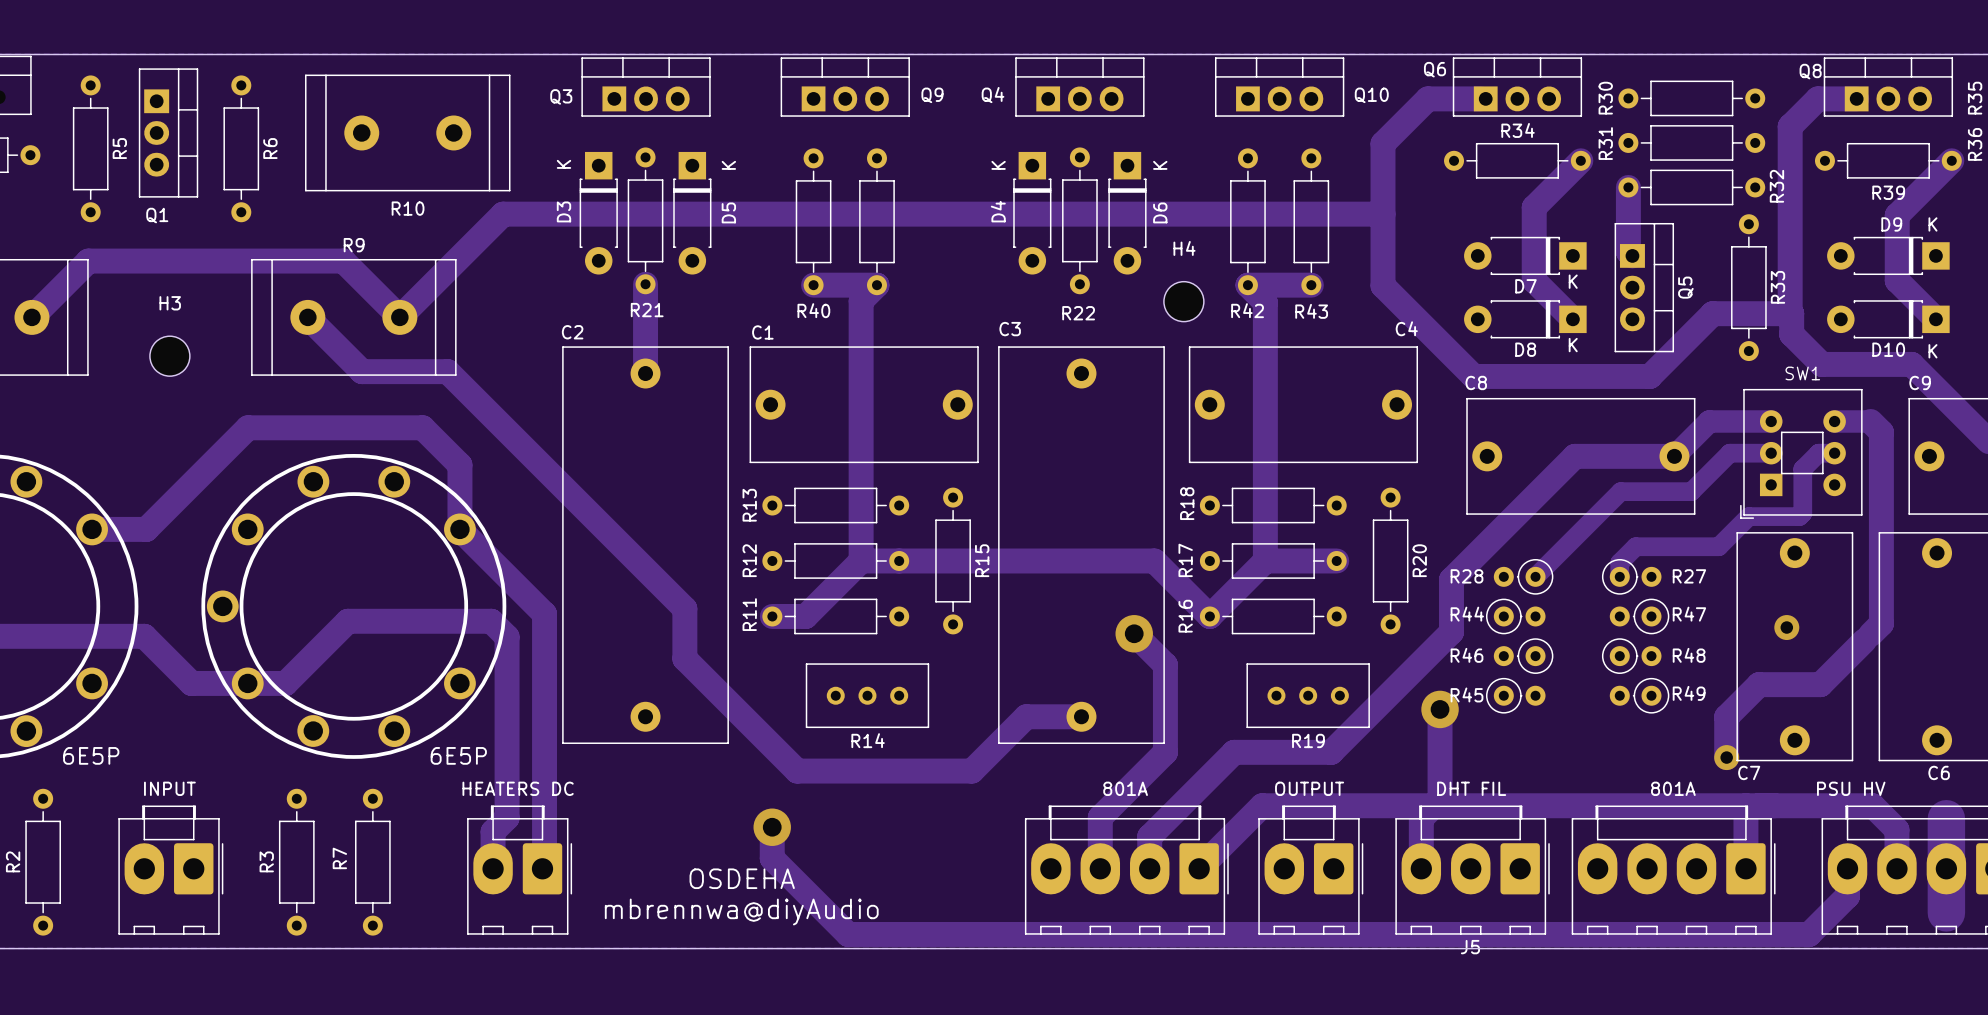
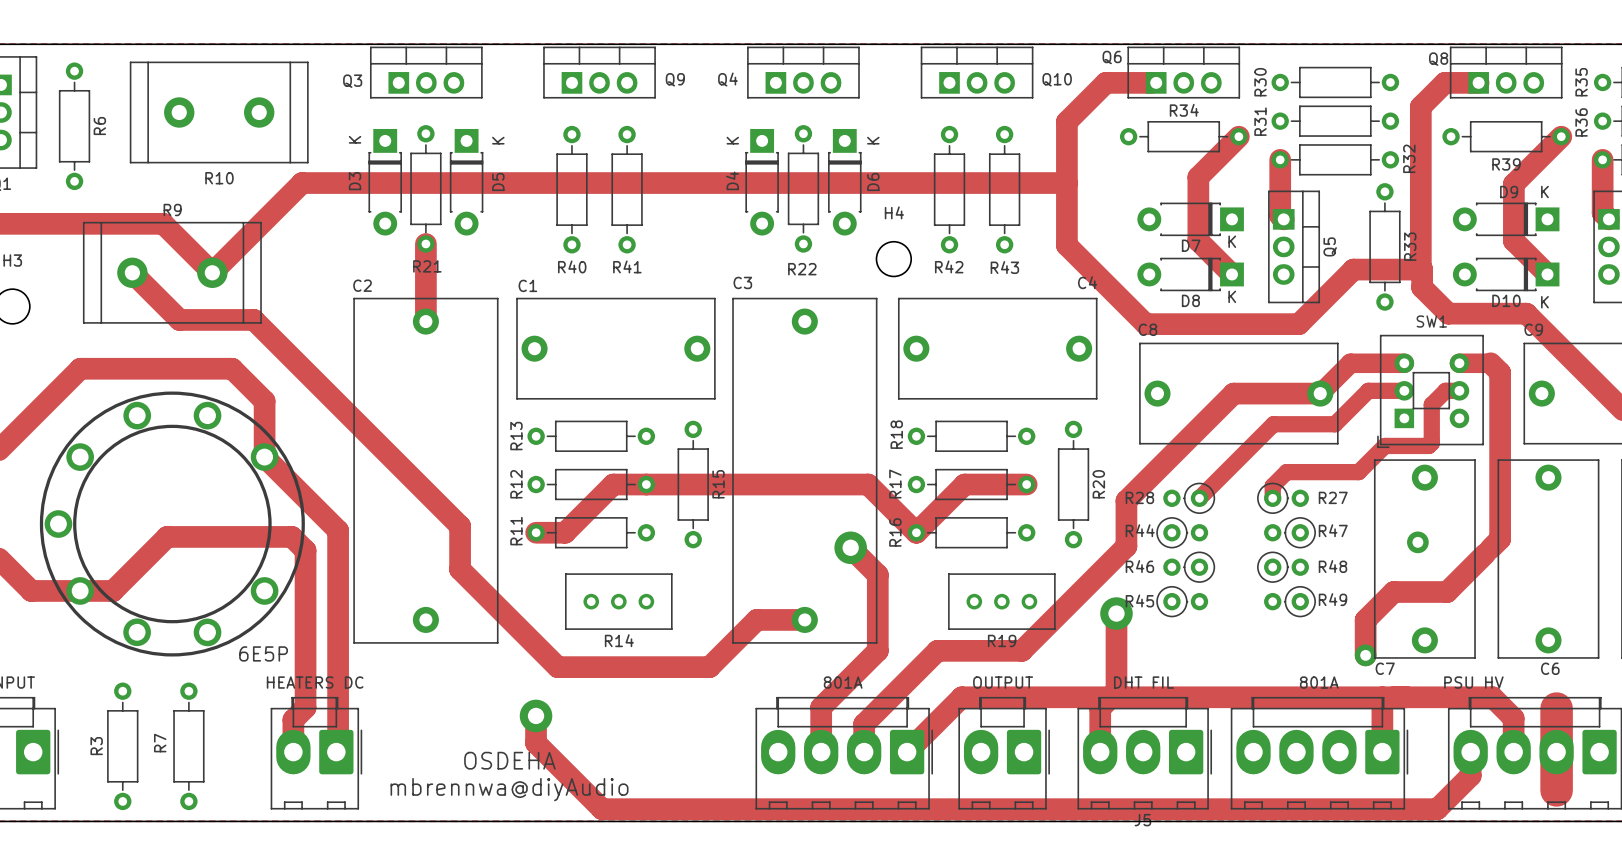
track: (813, 285) (876, 285) (861, 301) (861, 560) -> none
track: (1311, 285) (1247, 285) (1265, 302) (1265, 560) -> none
R41 name: none -> R41 (627, 266)

